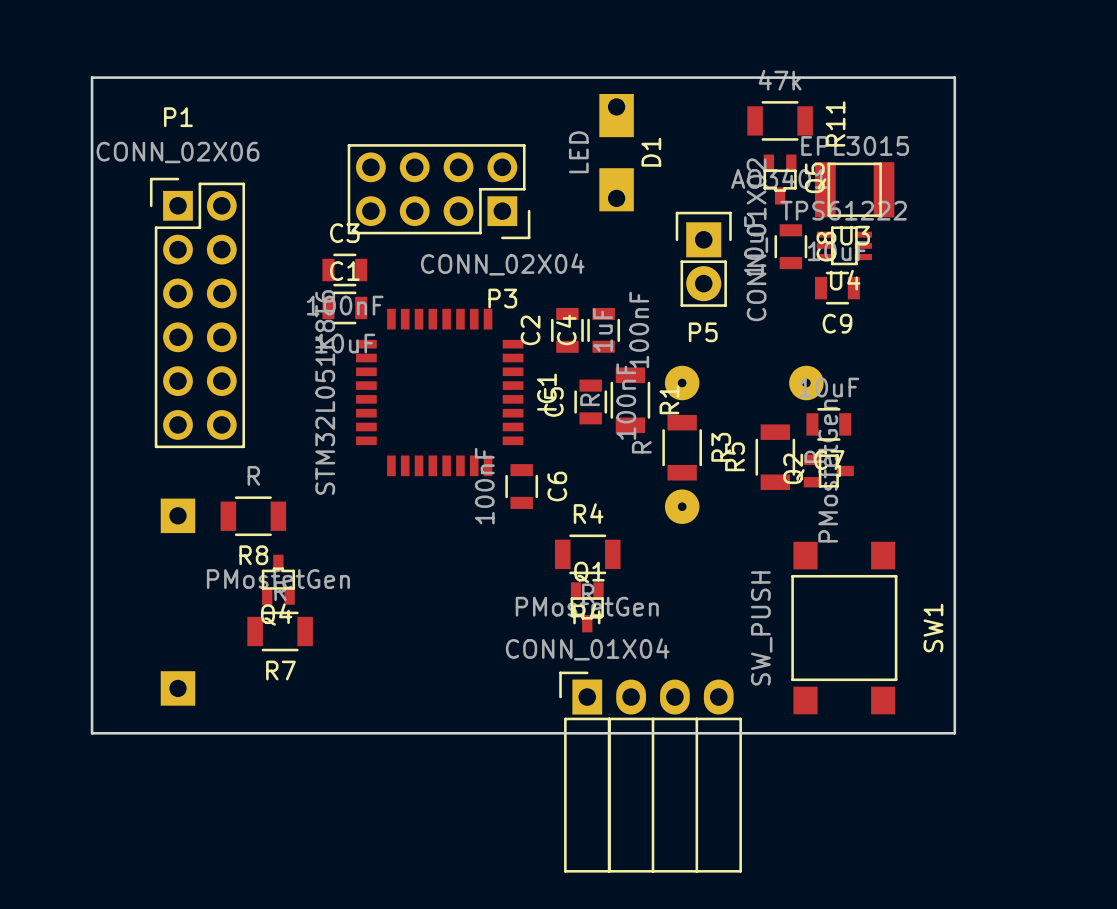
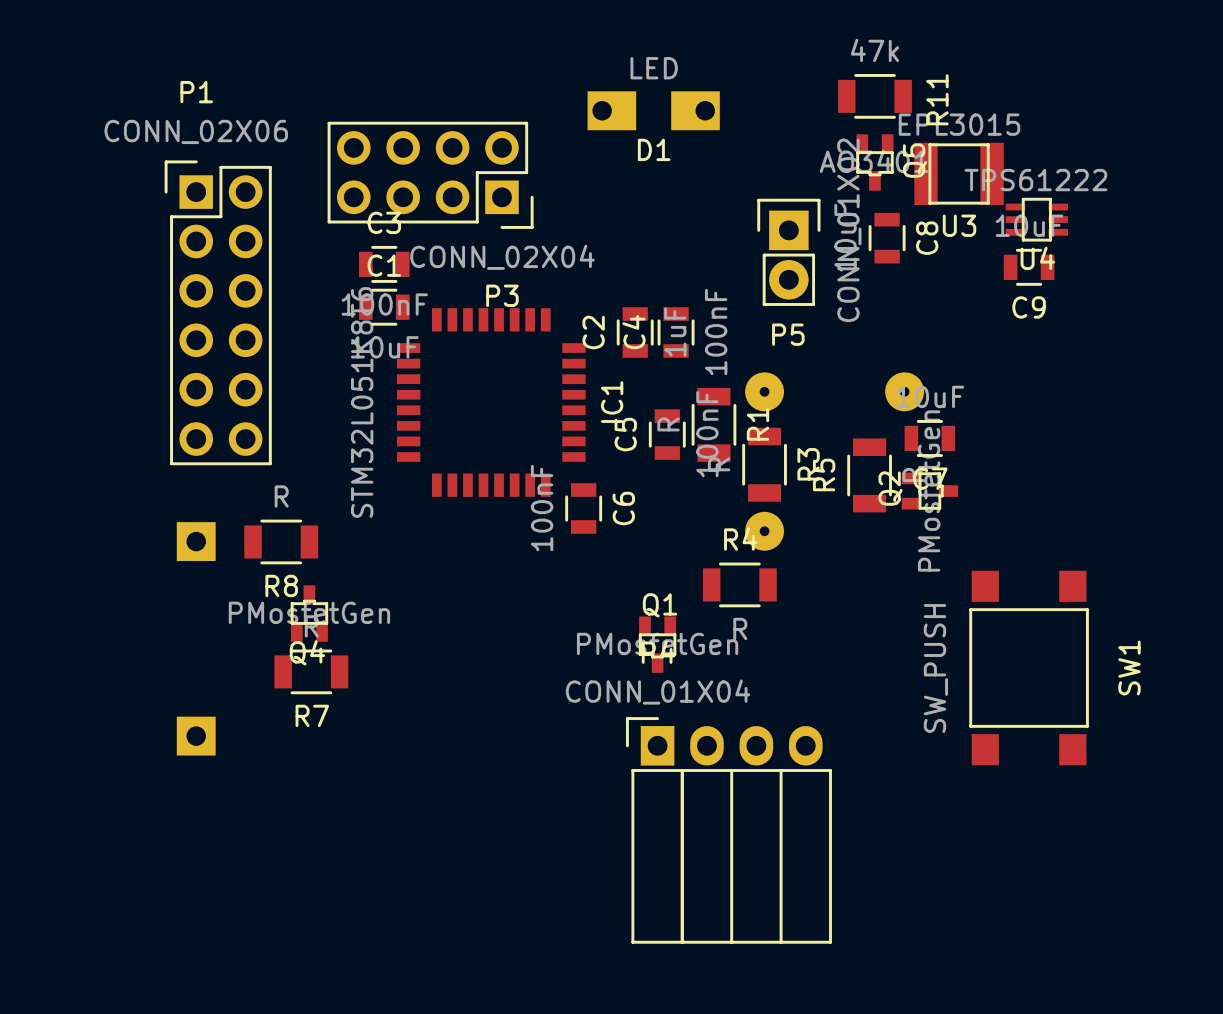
board edge: (92, 77) (92, 733) (954, 733) (954, 77) (92, 77) -> none
D1 rotation: 0° (616, 152) -> 90° clockwise (653, 110)
P3 position: (439, 191) -> (430, 175)
U4 position: (844, 245) -> (1036, 219)
C9 position: (837, 288) -> (1029, 267)
R1 position: (630, 400) -> (713, 424)
C5 position: (590, 401) -> (667, 434)
R4 position: (587, 554) -> (739, 584)
SW1 position: (844, 628) -> (1029, 668)

